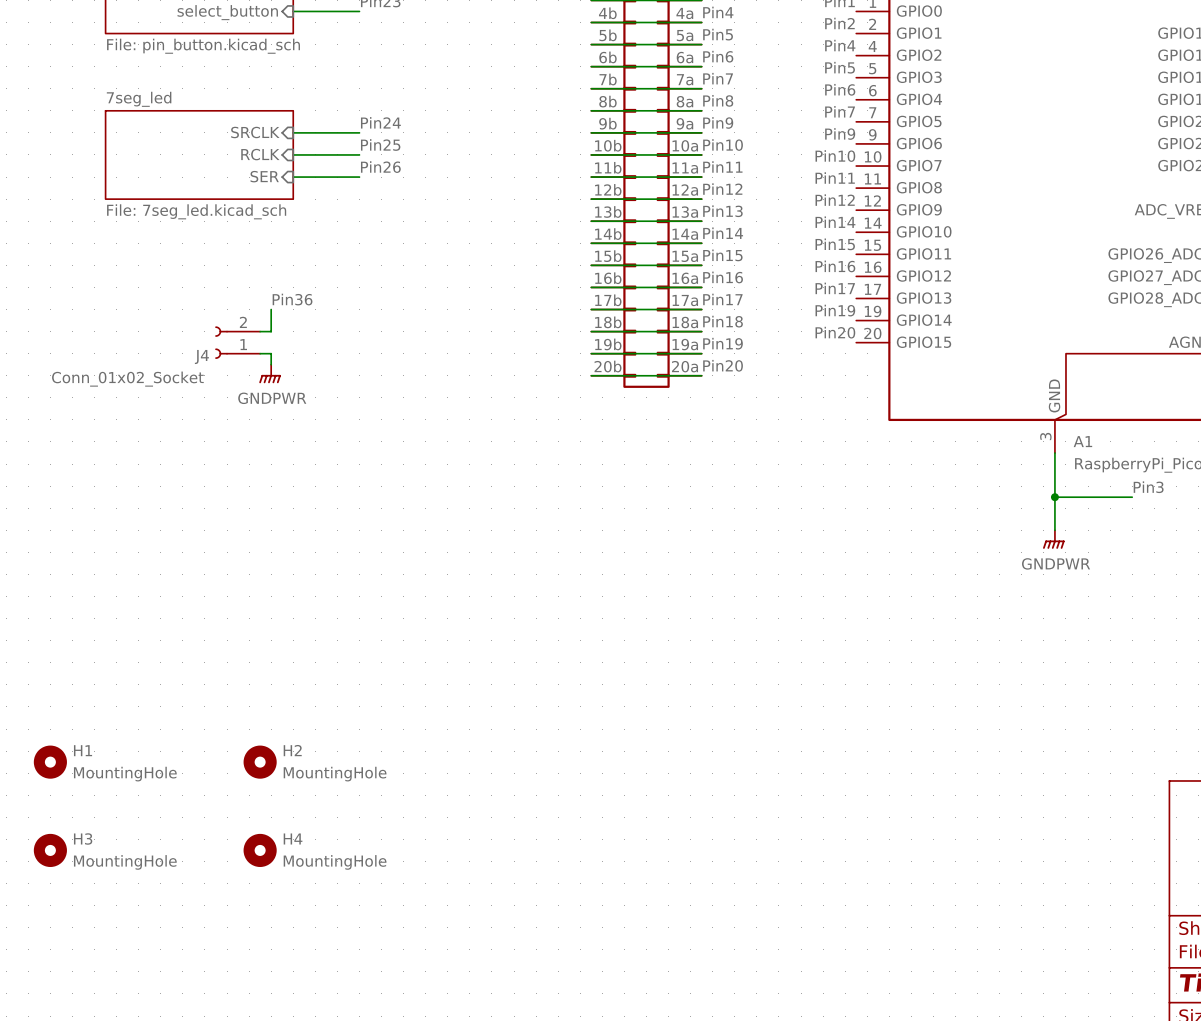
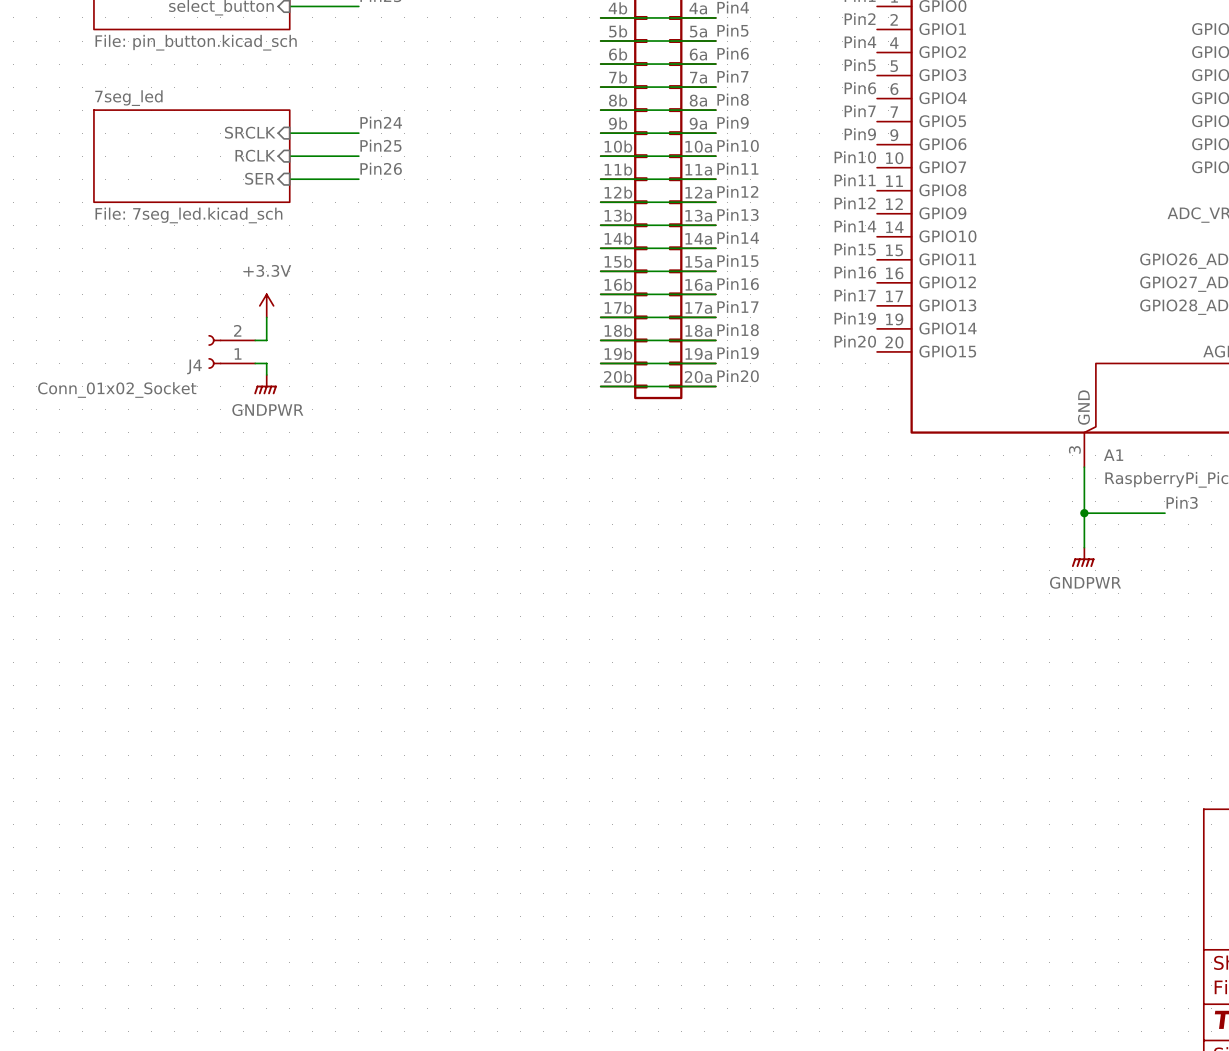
power symbol: none -> +3.3V (266, 305)
label: Pin36 (292, 299) -> none
H1: MountingHole (50, 762) -> none
H2: MountingHole (260, 762) -> none
H3: MountingHole (50, 850) -> none
H4: MountingHole (260, 850) -> none

